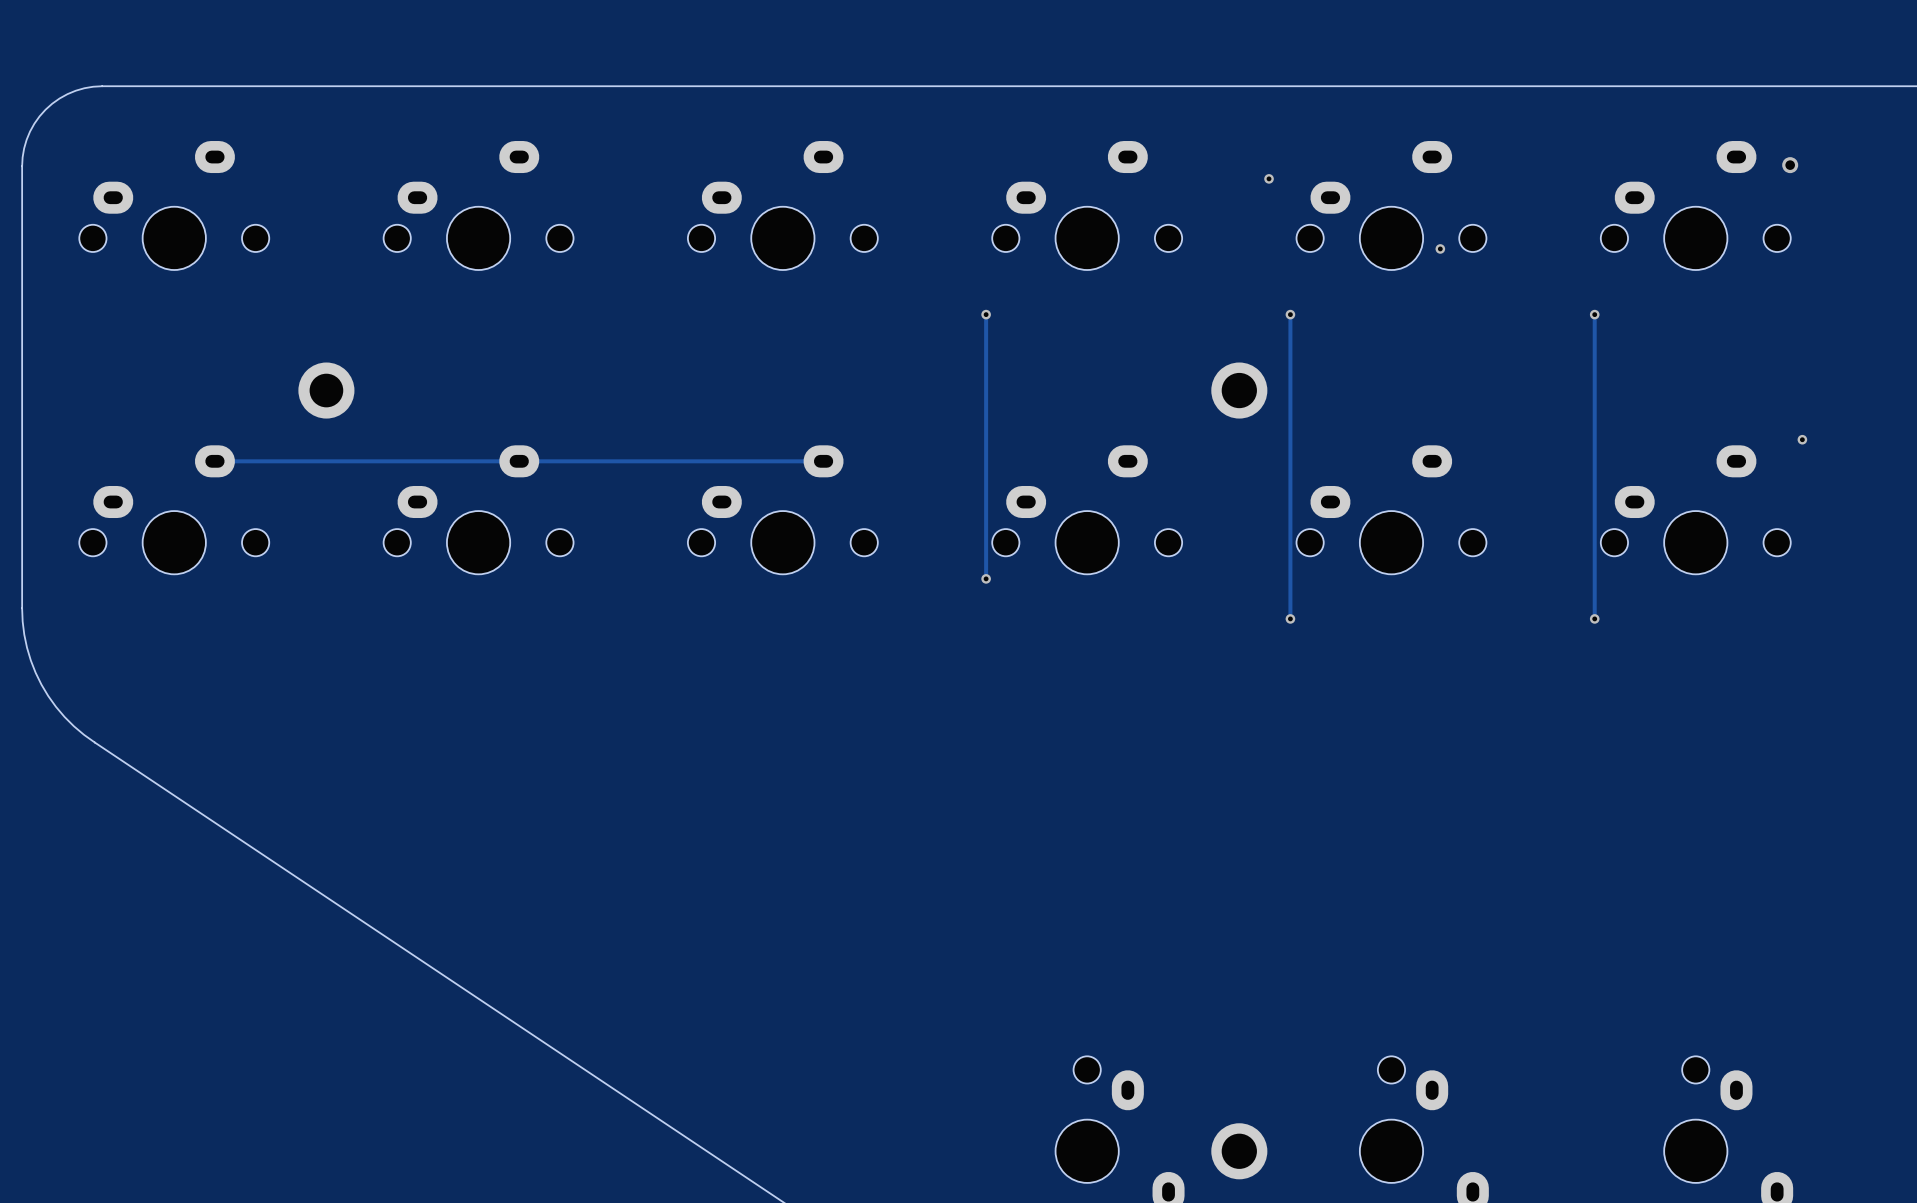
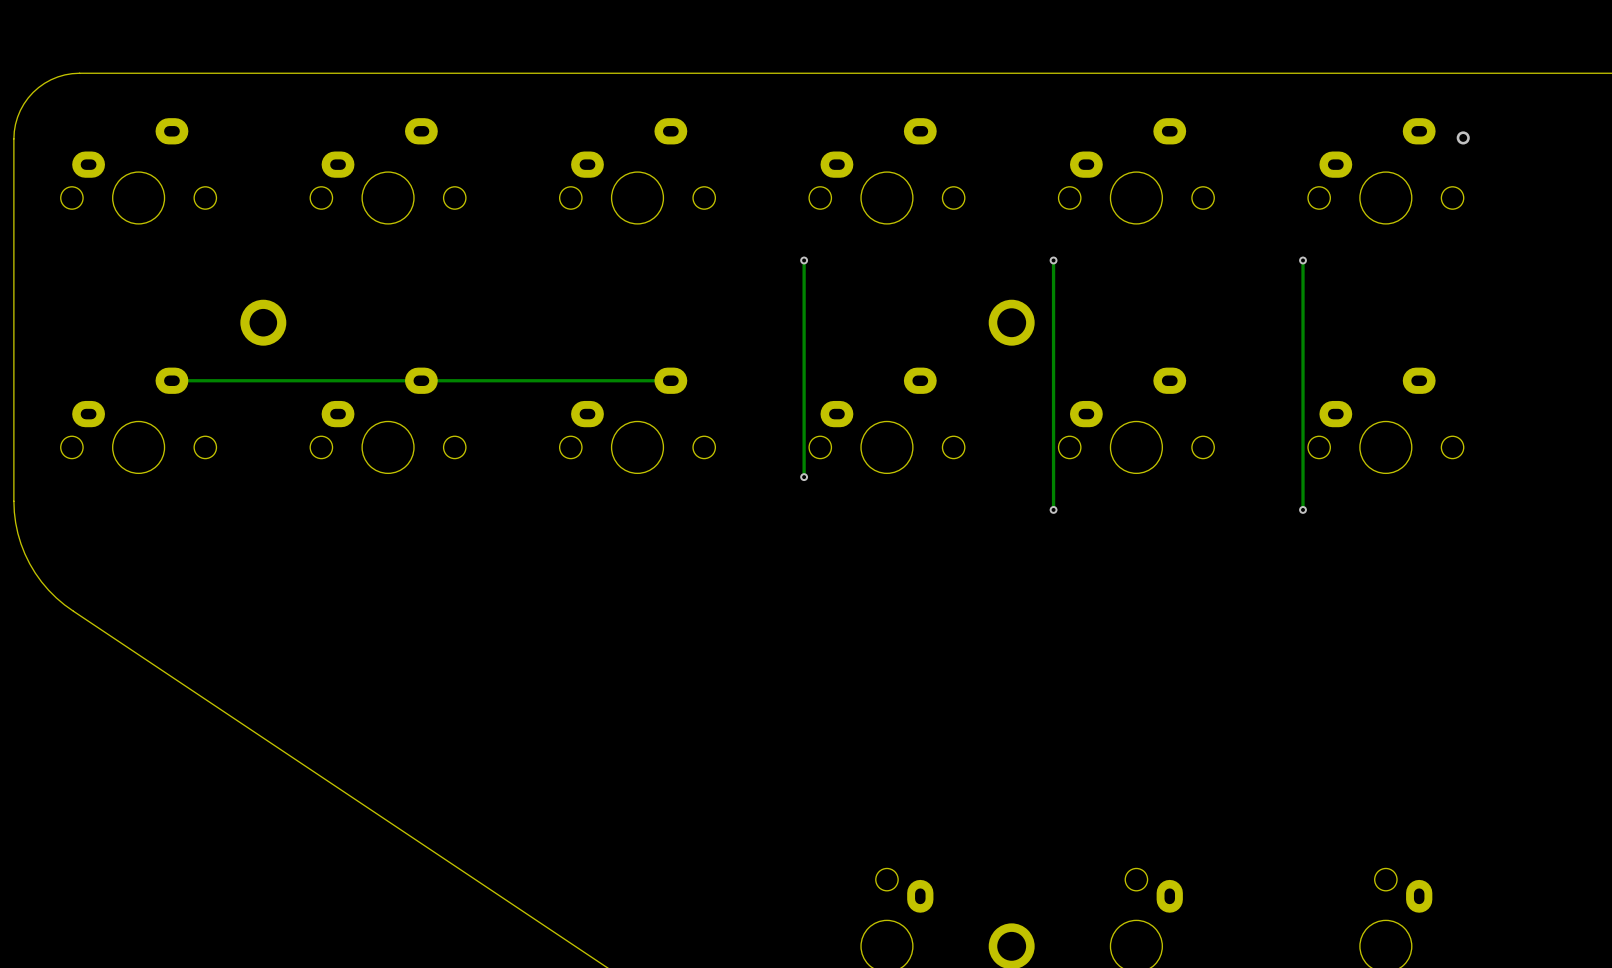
via: (1269, 178) -> none
via: (1440, 248) -> none
via: (1802, 439) -> none

